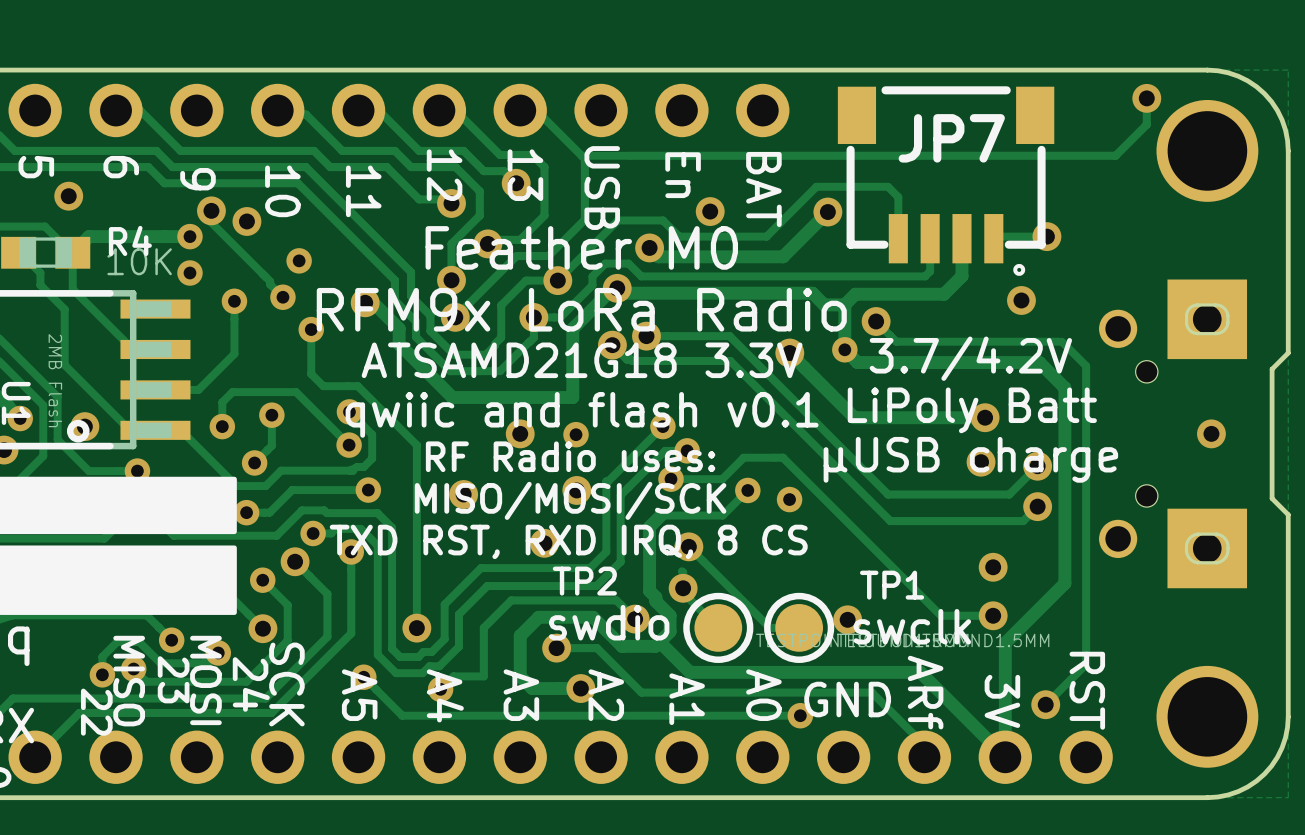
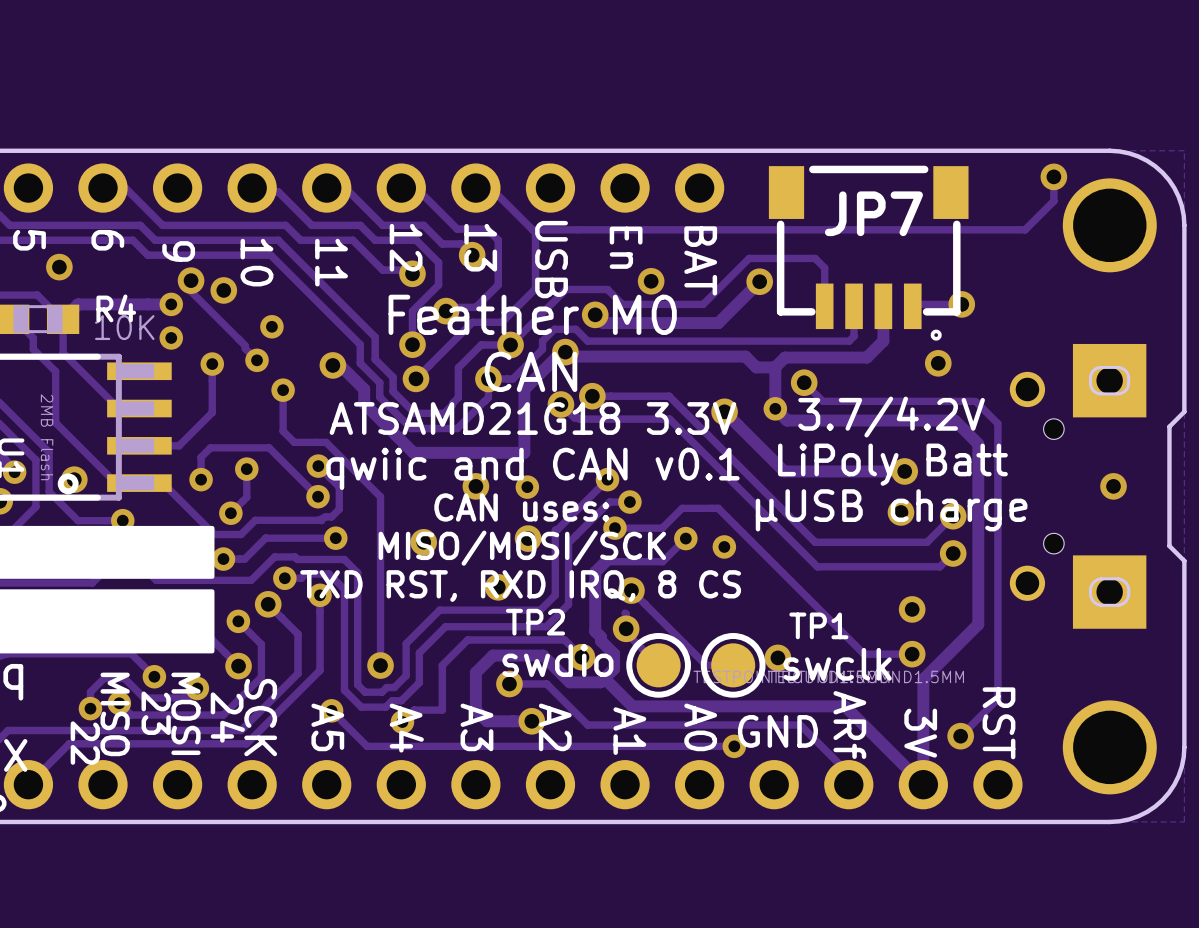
text: RFM9x LoRa Radio (581, 309) -> CAN (530, 371)
text: qwiic and flash v0.1 (582, 414) -> qwiic and CAN v0.1 (532, 468)
text: RF Radio uses: (570, 456) -> CAN uses: (521, 507)

